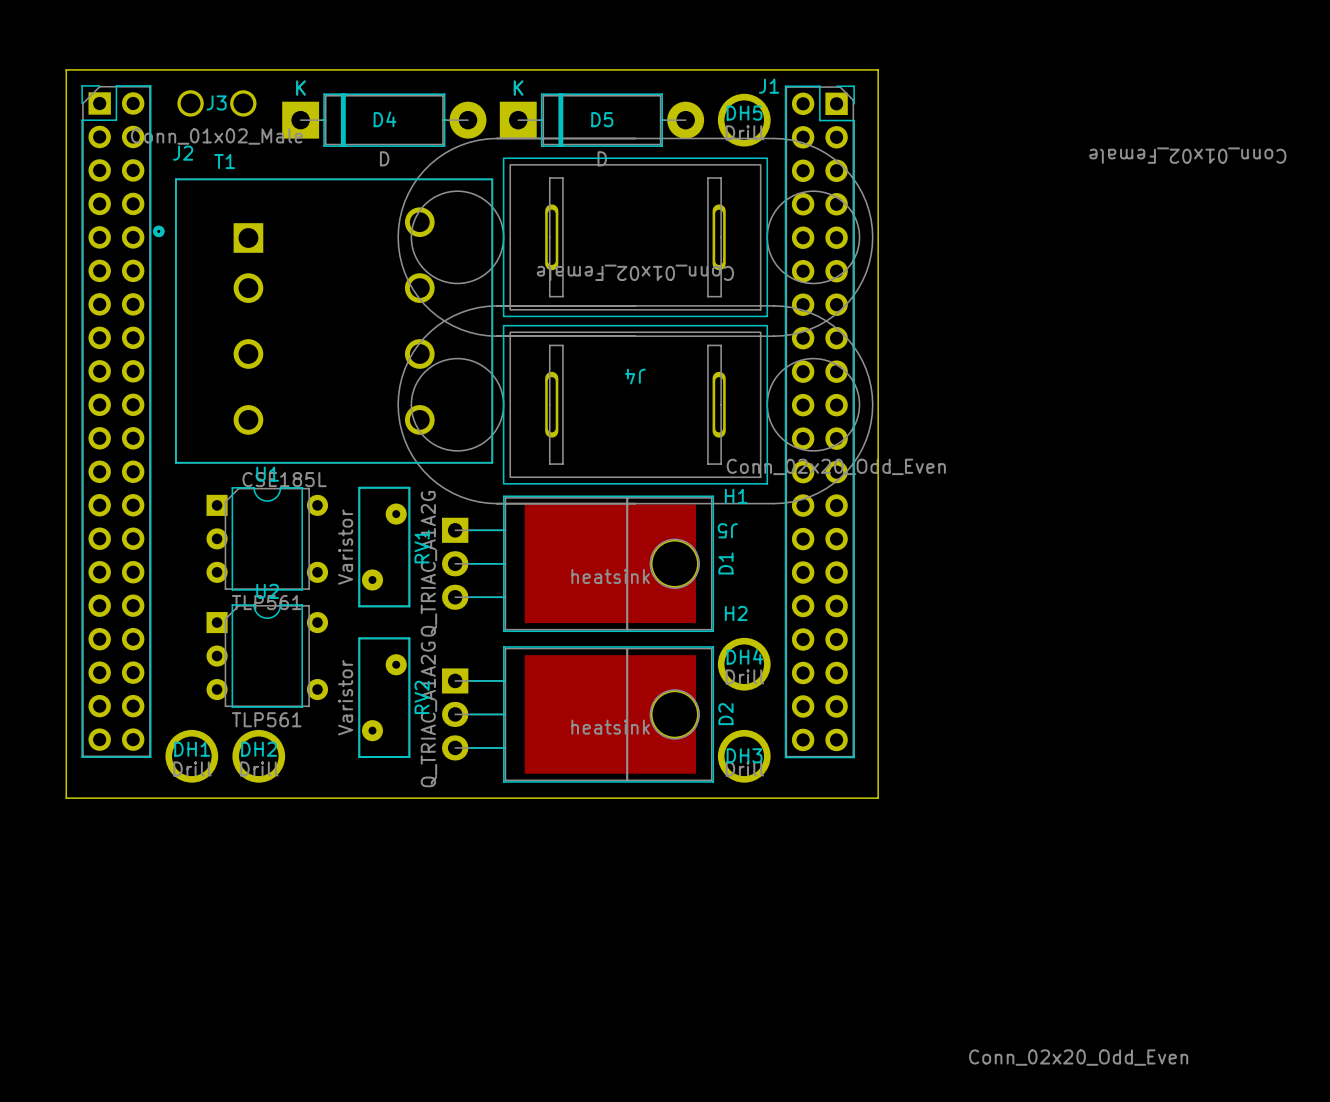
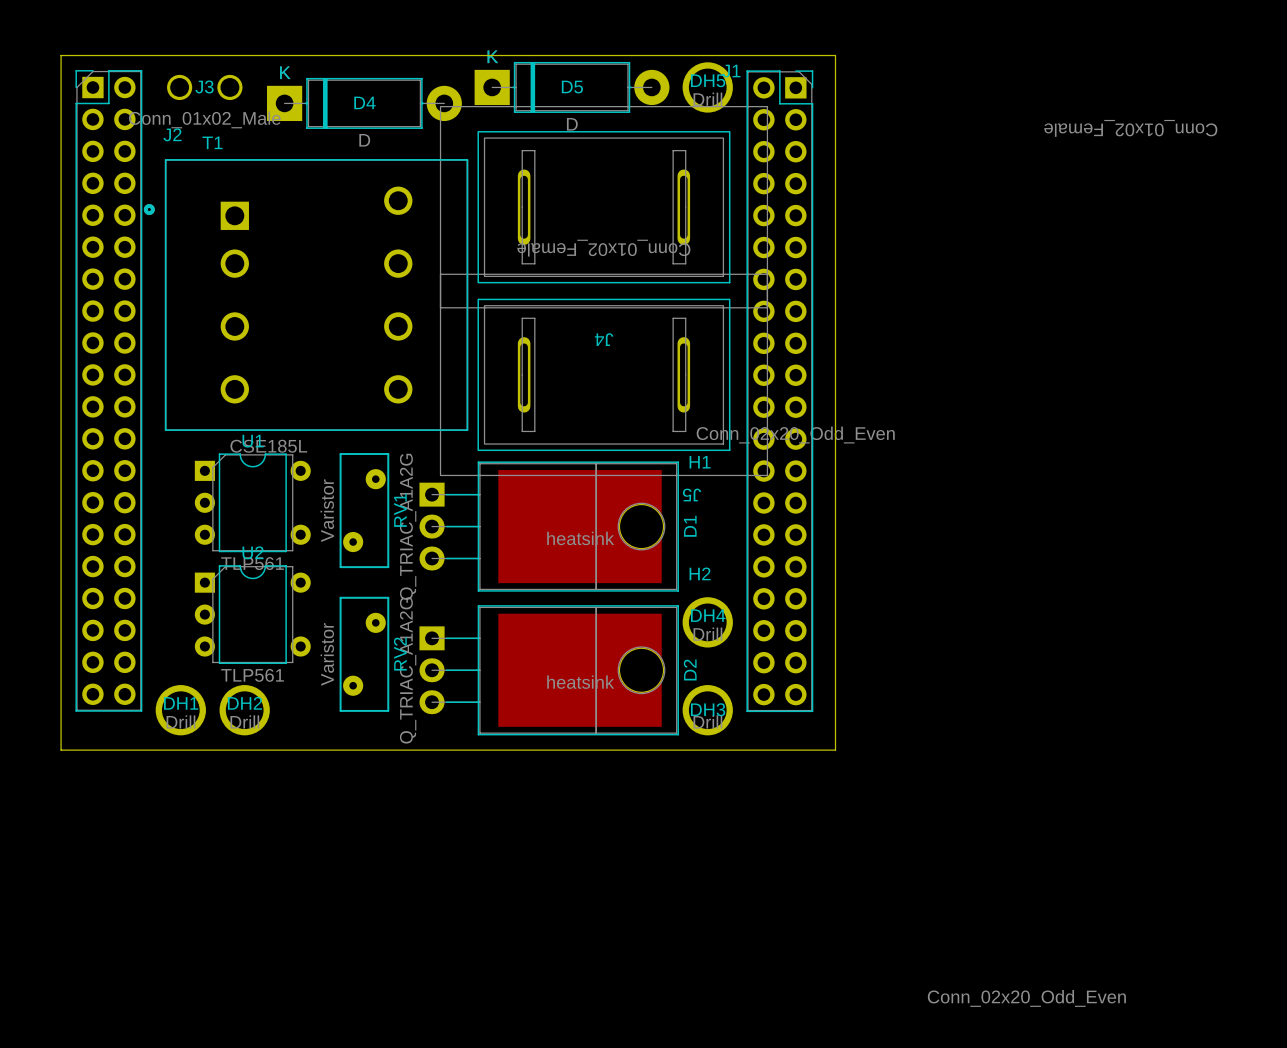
D5 position: (601, 120) -> (572, 87)
DH5 position: (744, 120) -> (707, 87)
J4 footprint: [397, 137, 874, 337] -> [439, 106, 769, 309]
J5 footprint: [397, 305, 874, 505] -> [439, 273, 769, 477]

